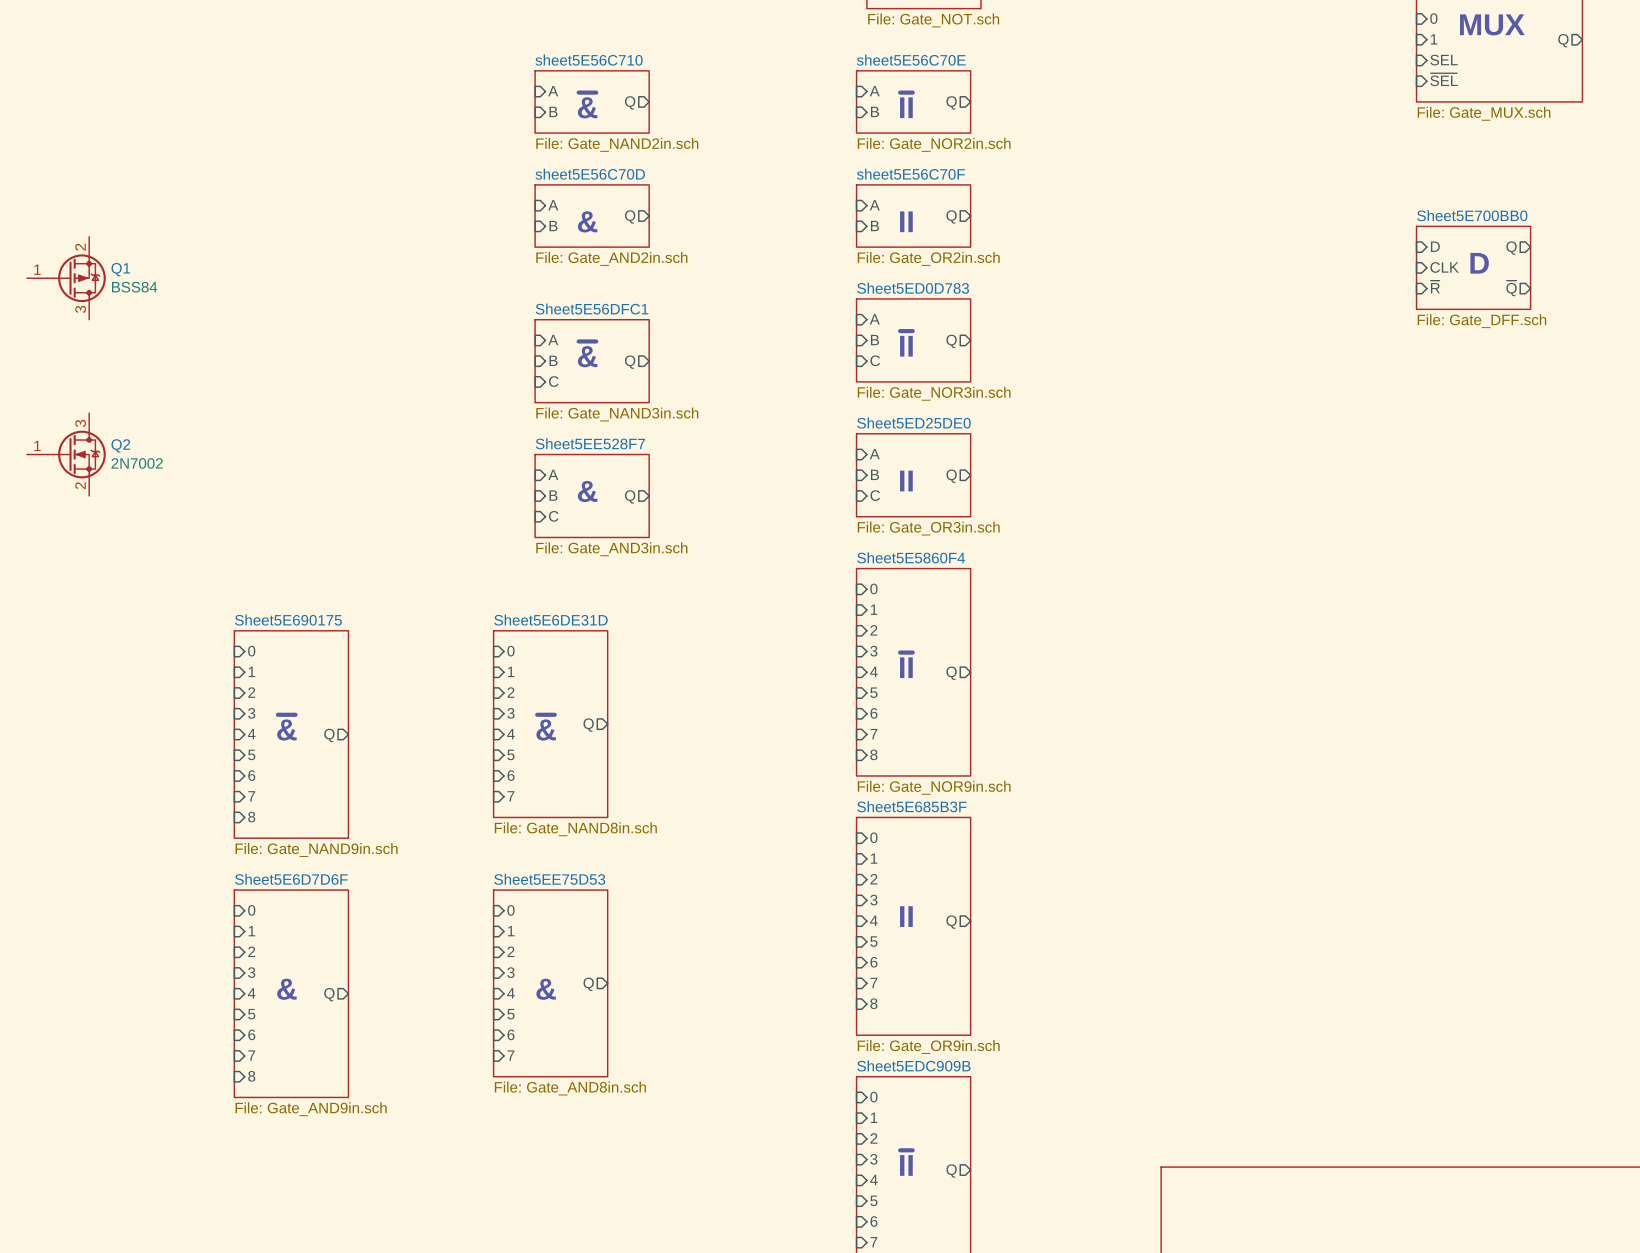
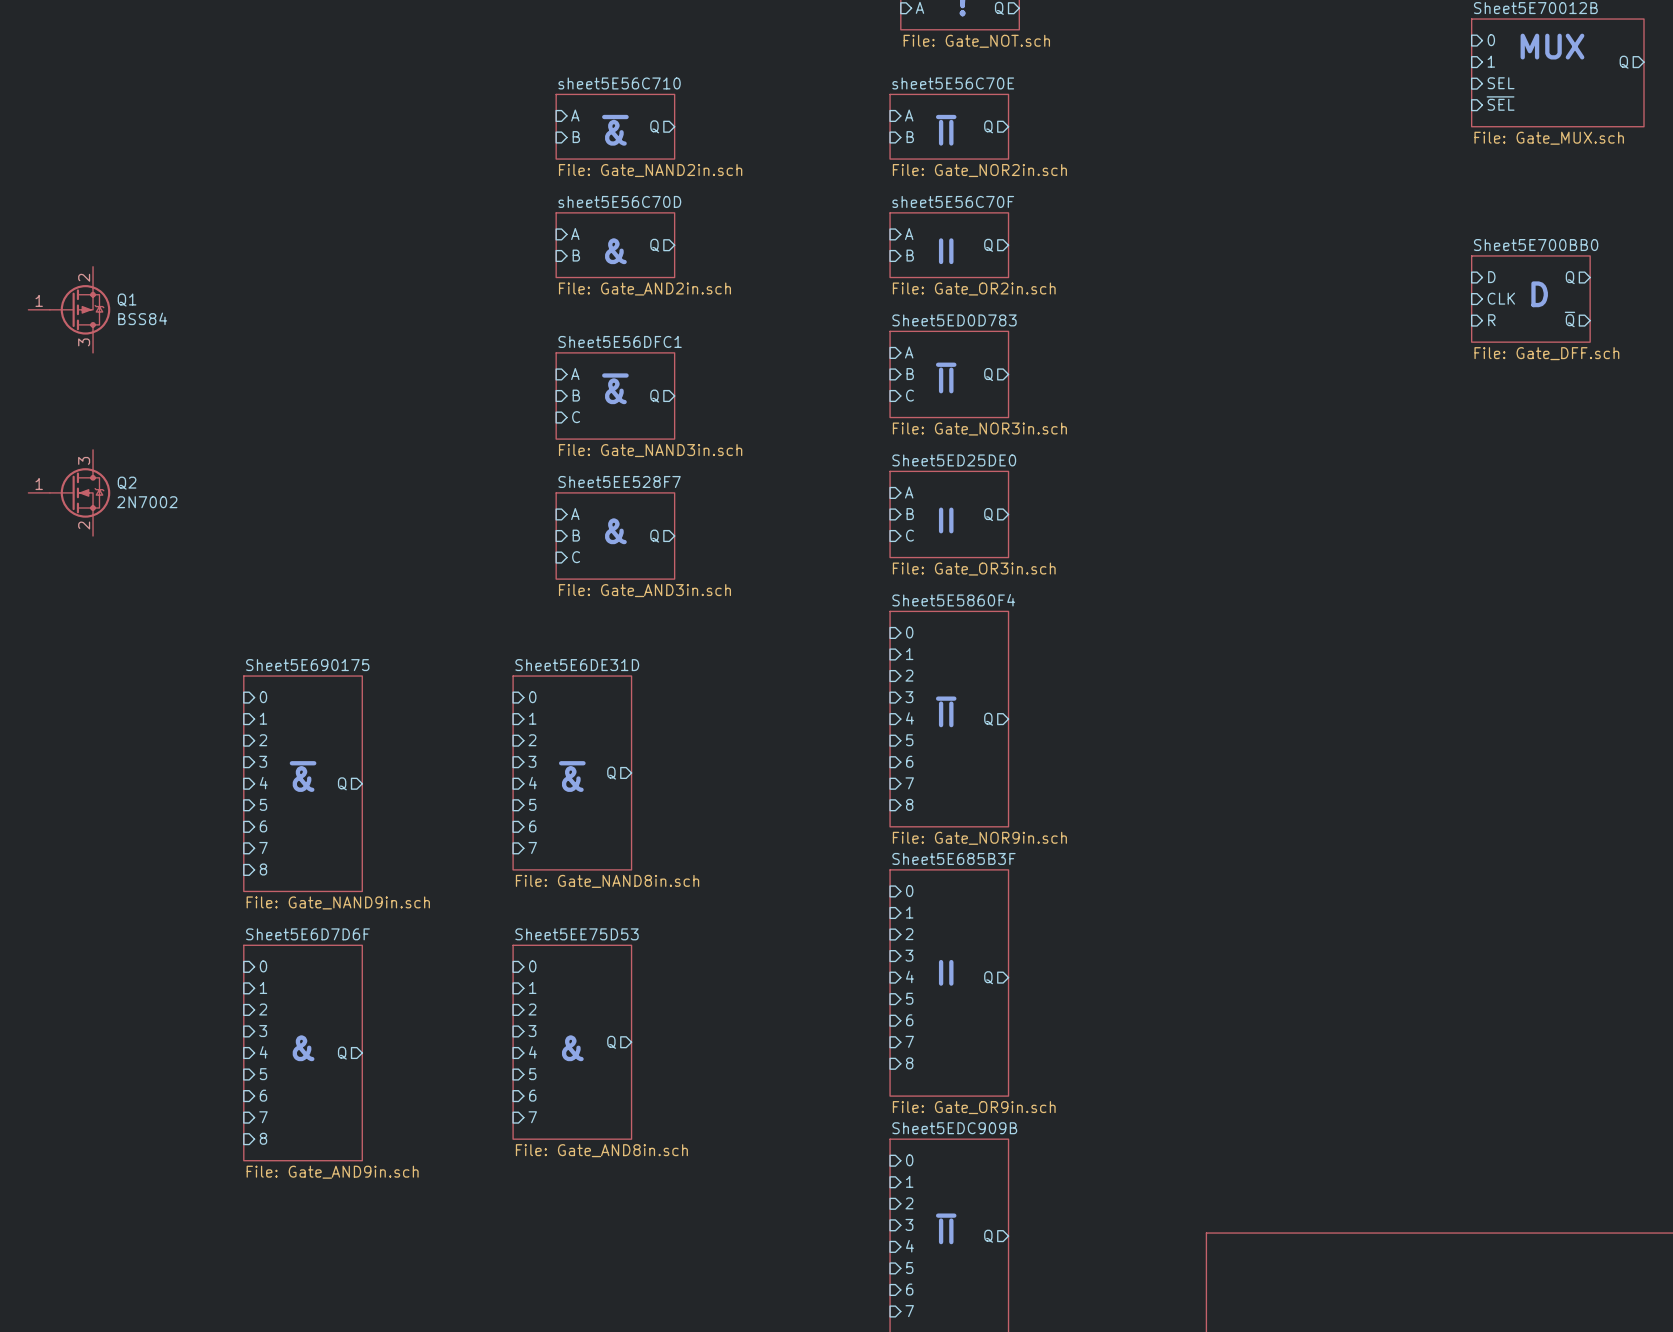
sheet pin: ~{R} (1435, 287) -> R (1491, 320)

